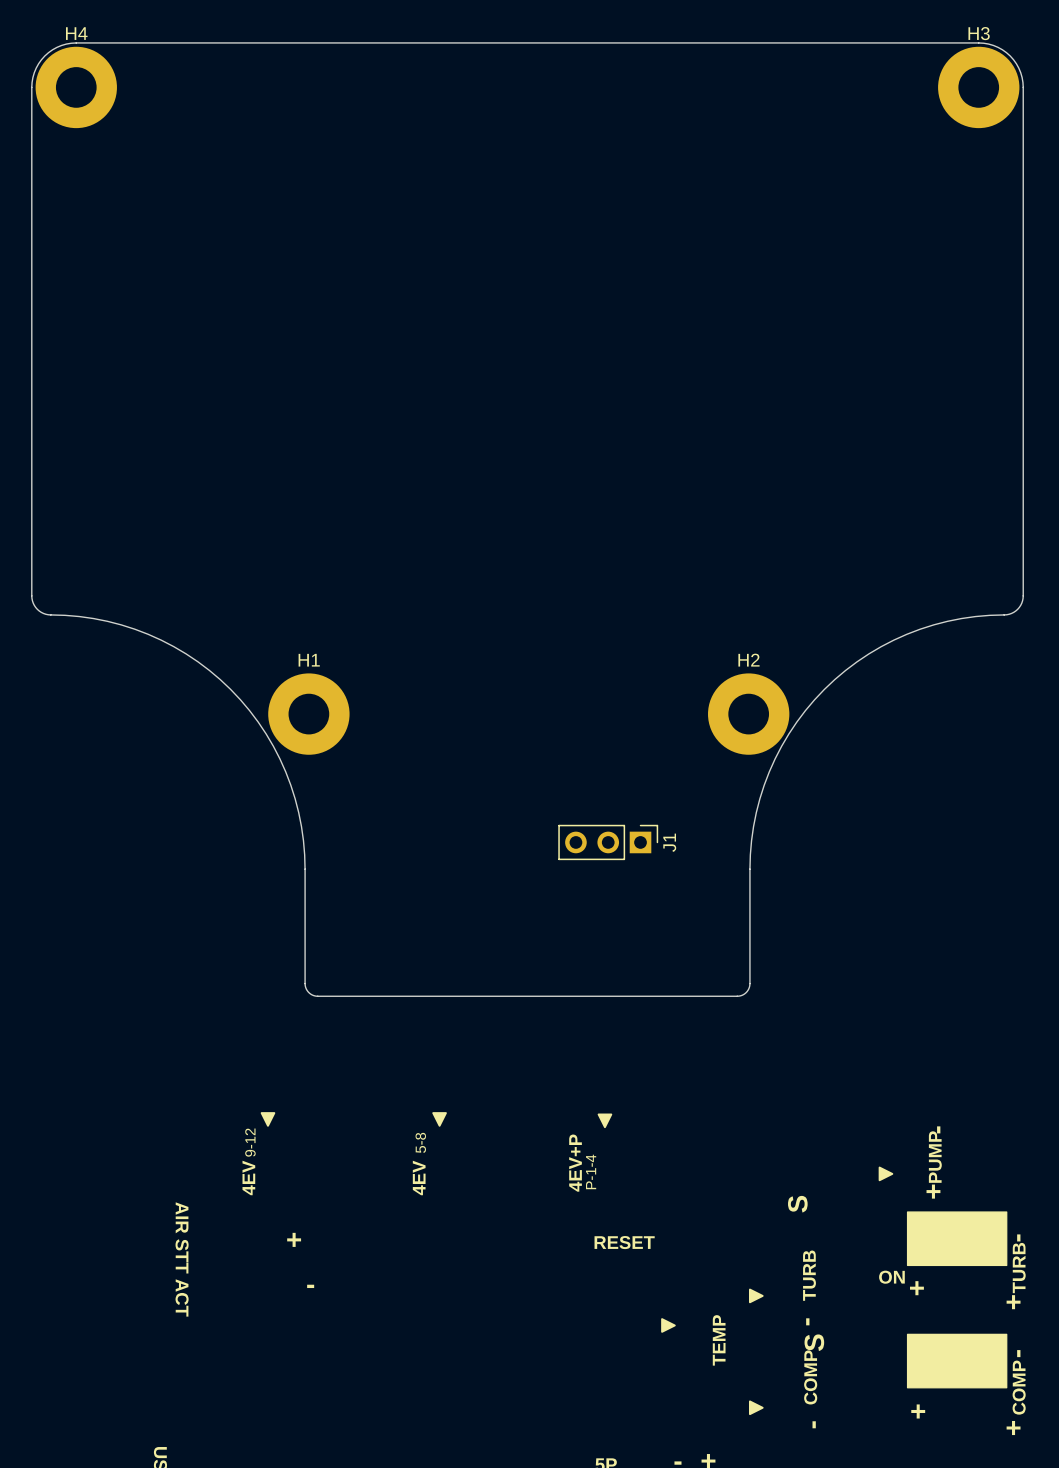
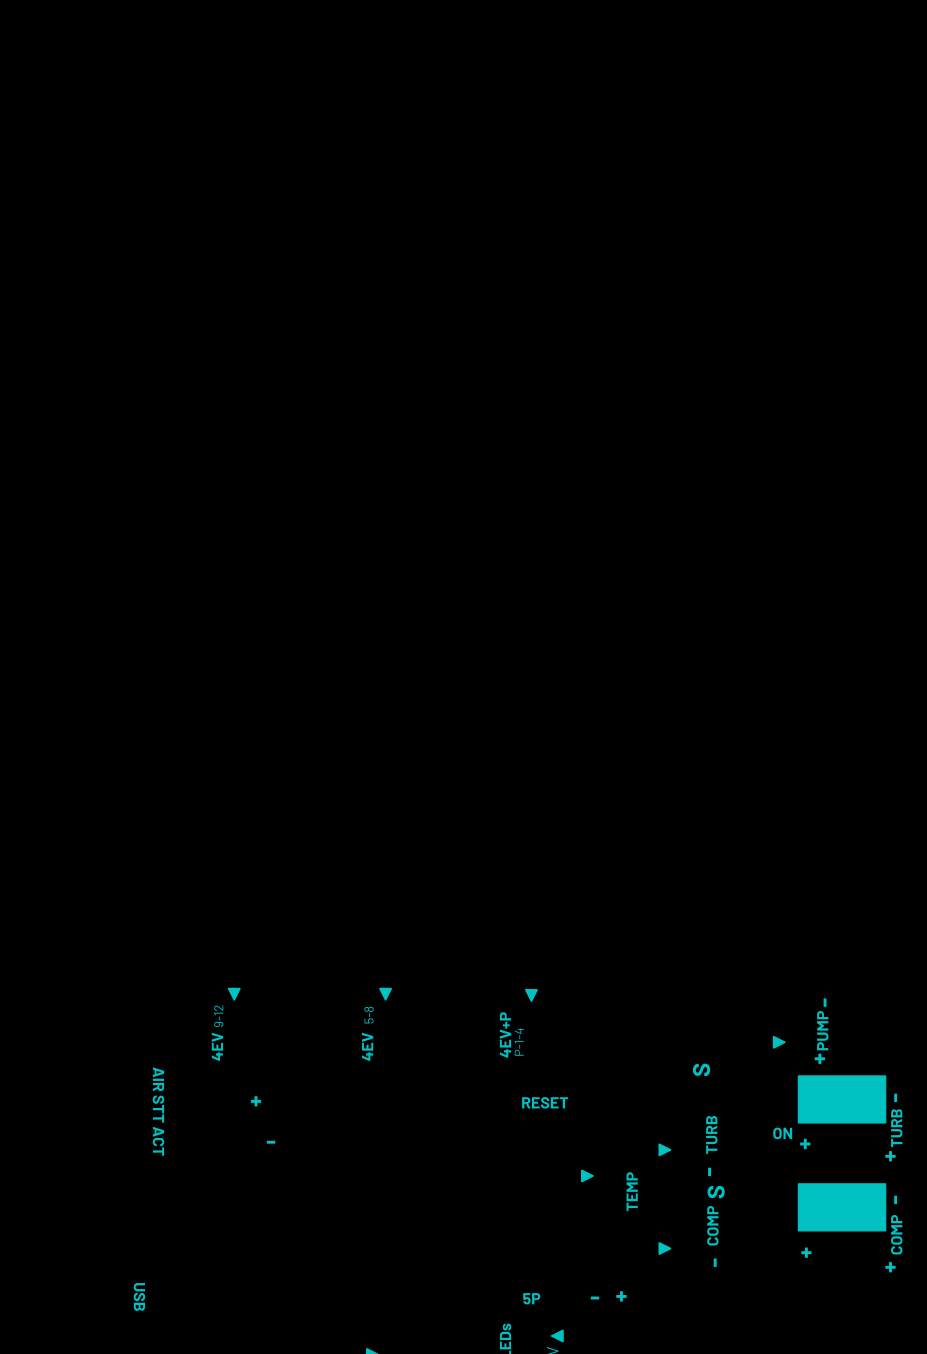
board edge: (76, 42) (978, 42) (998, 47) (1010, 55) (1016, 63) (1022, 77) (1023, 87) (1022, 600) (1017, 609) (1009, 614) (975, 616) (947, 621) (906, 634) (881, 646) (857, 661) (834, 679) (814, 699) (796, 722) (781, 746) (769, 771) (759, 798) (753, 826) (749, 869) (749, 984) (744, 994) (737, 996) (312, 995) (307, 991) (305, 984) (305, 869) (301, 826) (295, 798) (285, 771) (273, 746) (258, 722) (240, 699) (220, 679) (186, 653) (161, 640) (121, 624) (79, 616) (45, 614) (35, 607) (31, 595) (32, 82) (36, 68) (44, 55) (56, 47) (76, 42) -> none
H4: (76, 87) -> none
H3: (978, 87) -> none
H1: (308, 714) -> none
H2: (748, 714) -> none
J1: (608, 842) -> none

